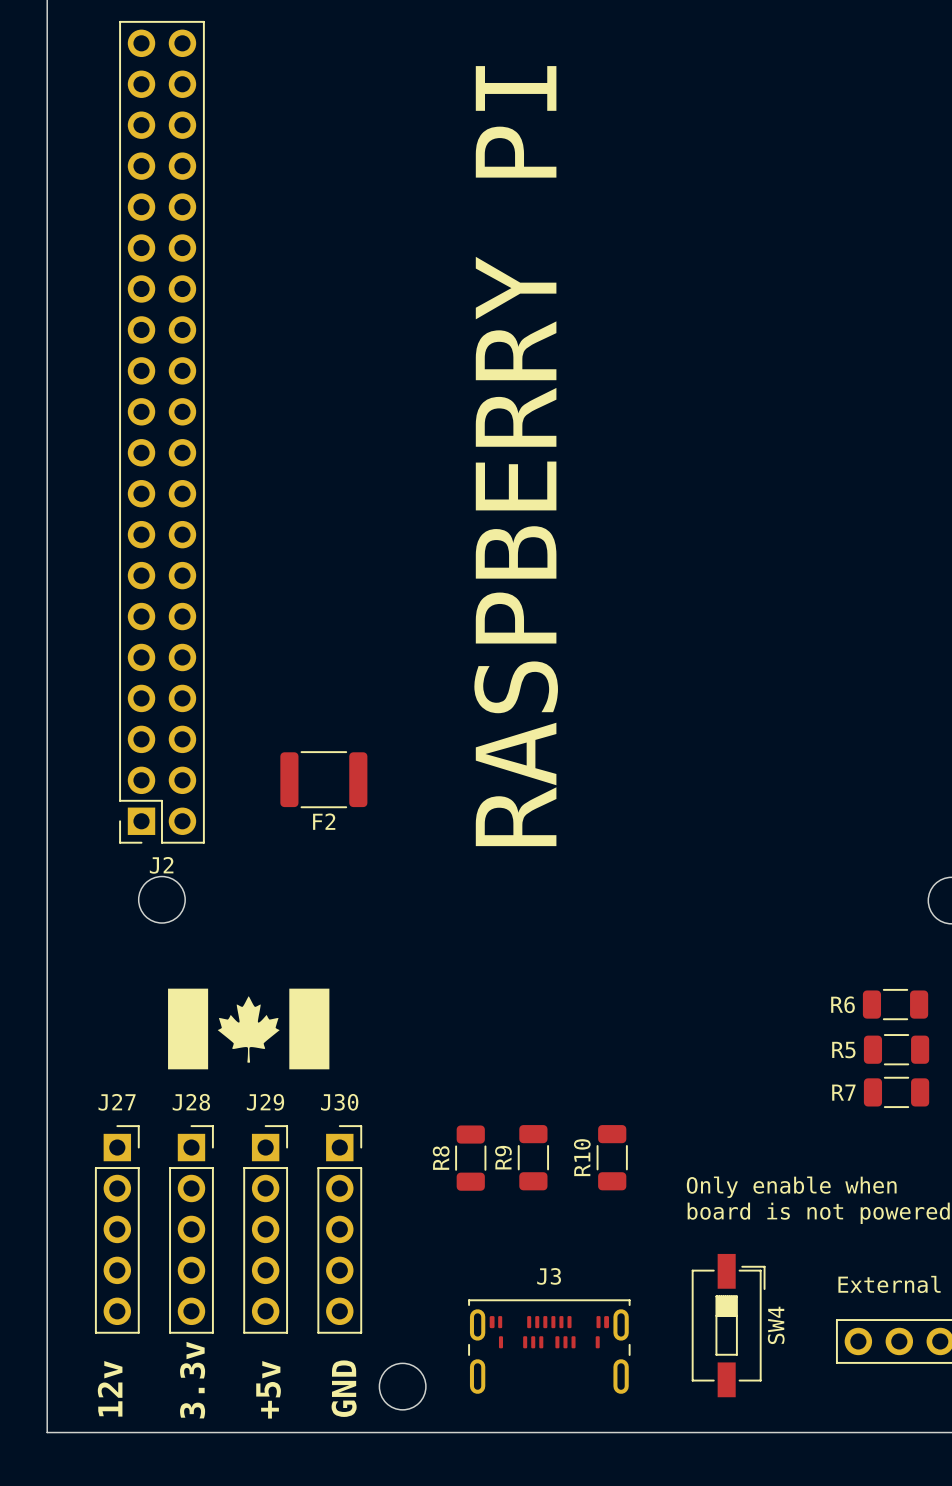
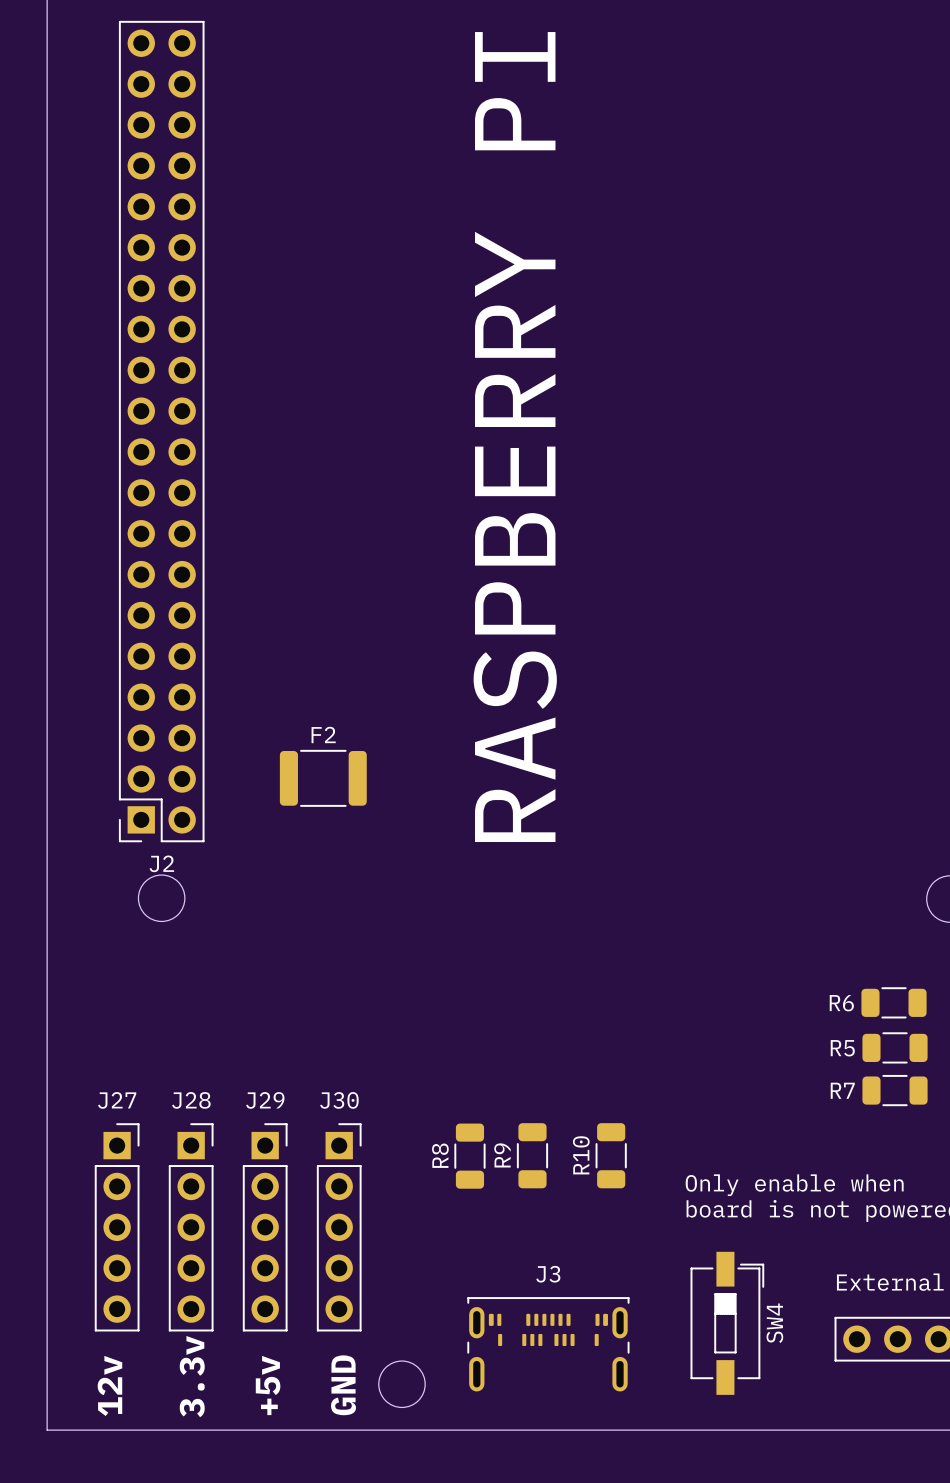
F2 name position: F2 (324, 821) -> F2 (323, 734)
drawing: [168, 988, 330, 1070] -> none

